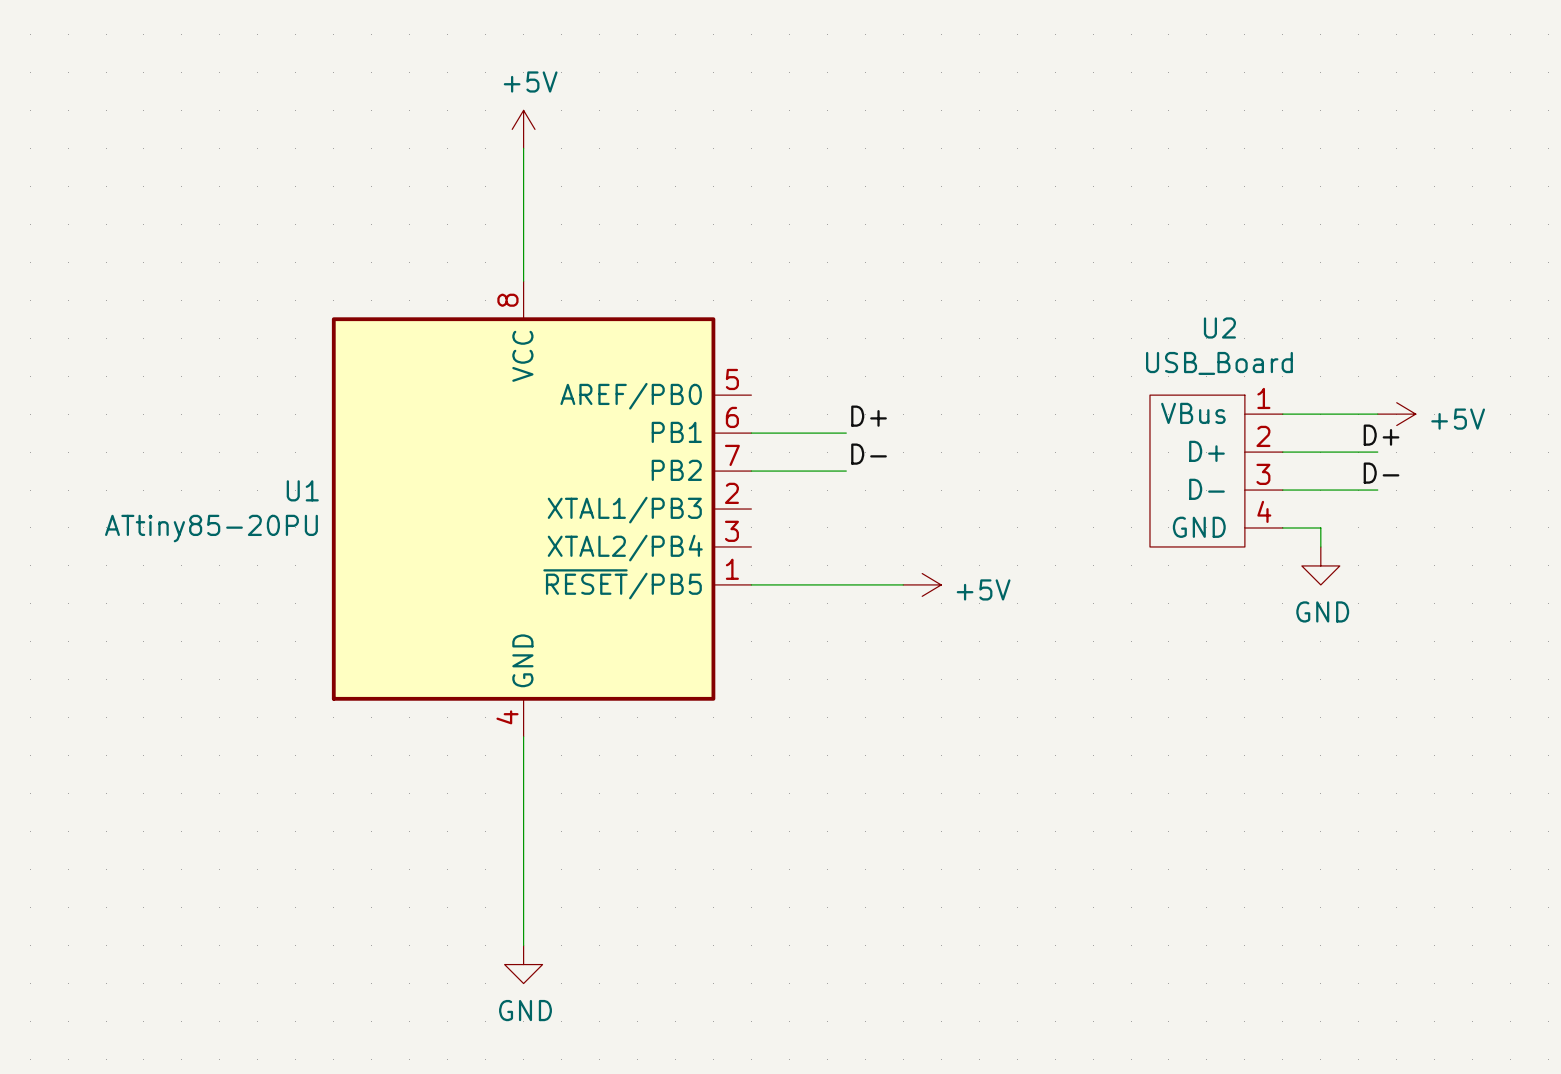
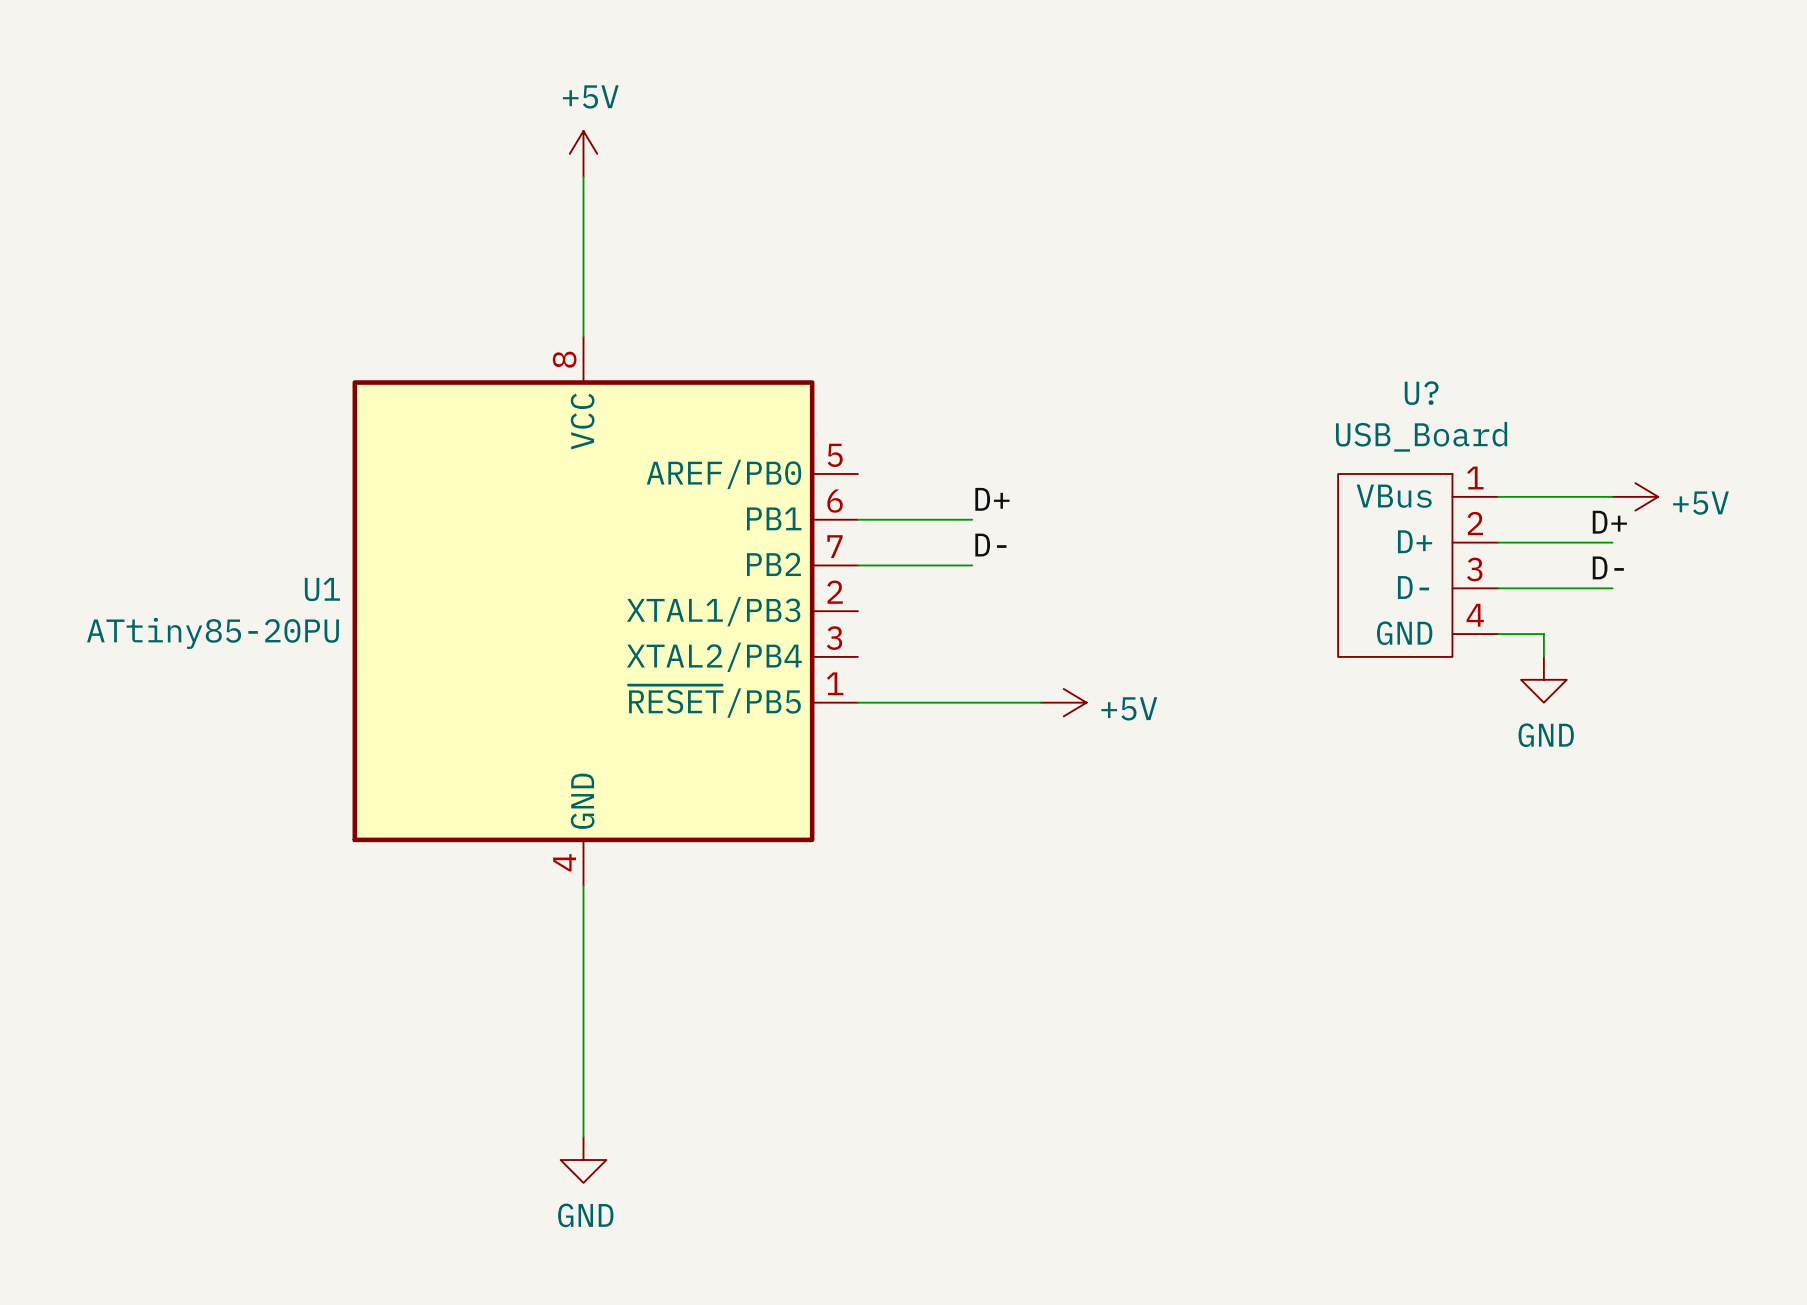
U2 name: U2 (1219, 327) -> U? (1421, 393)

